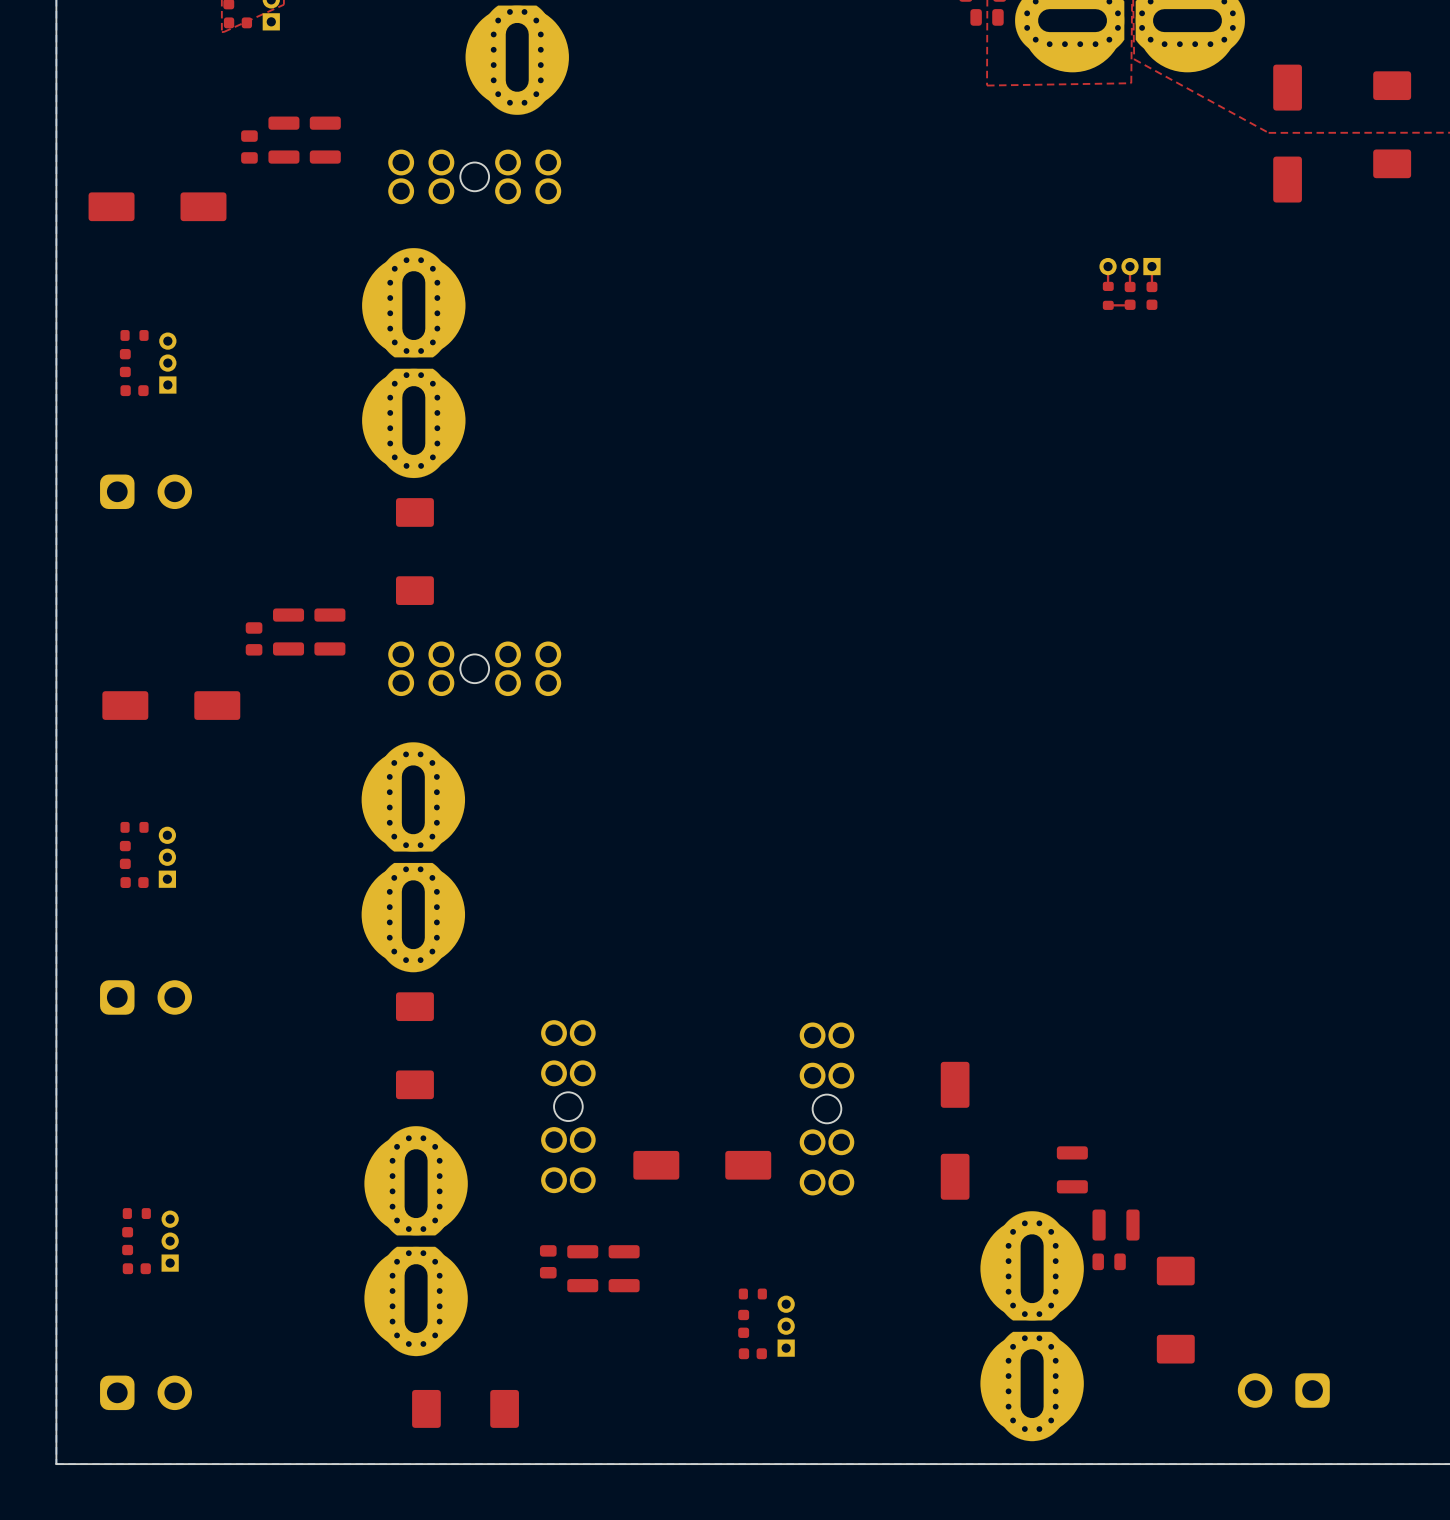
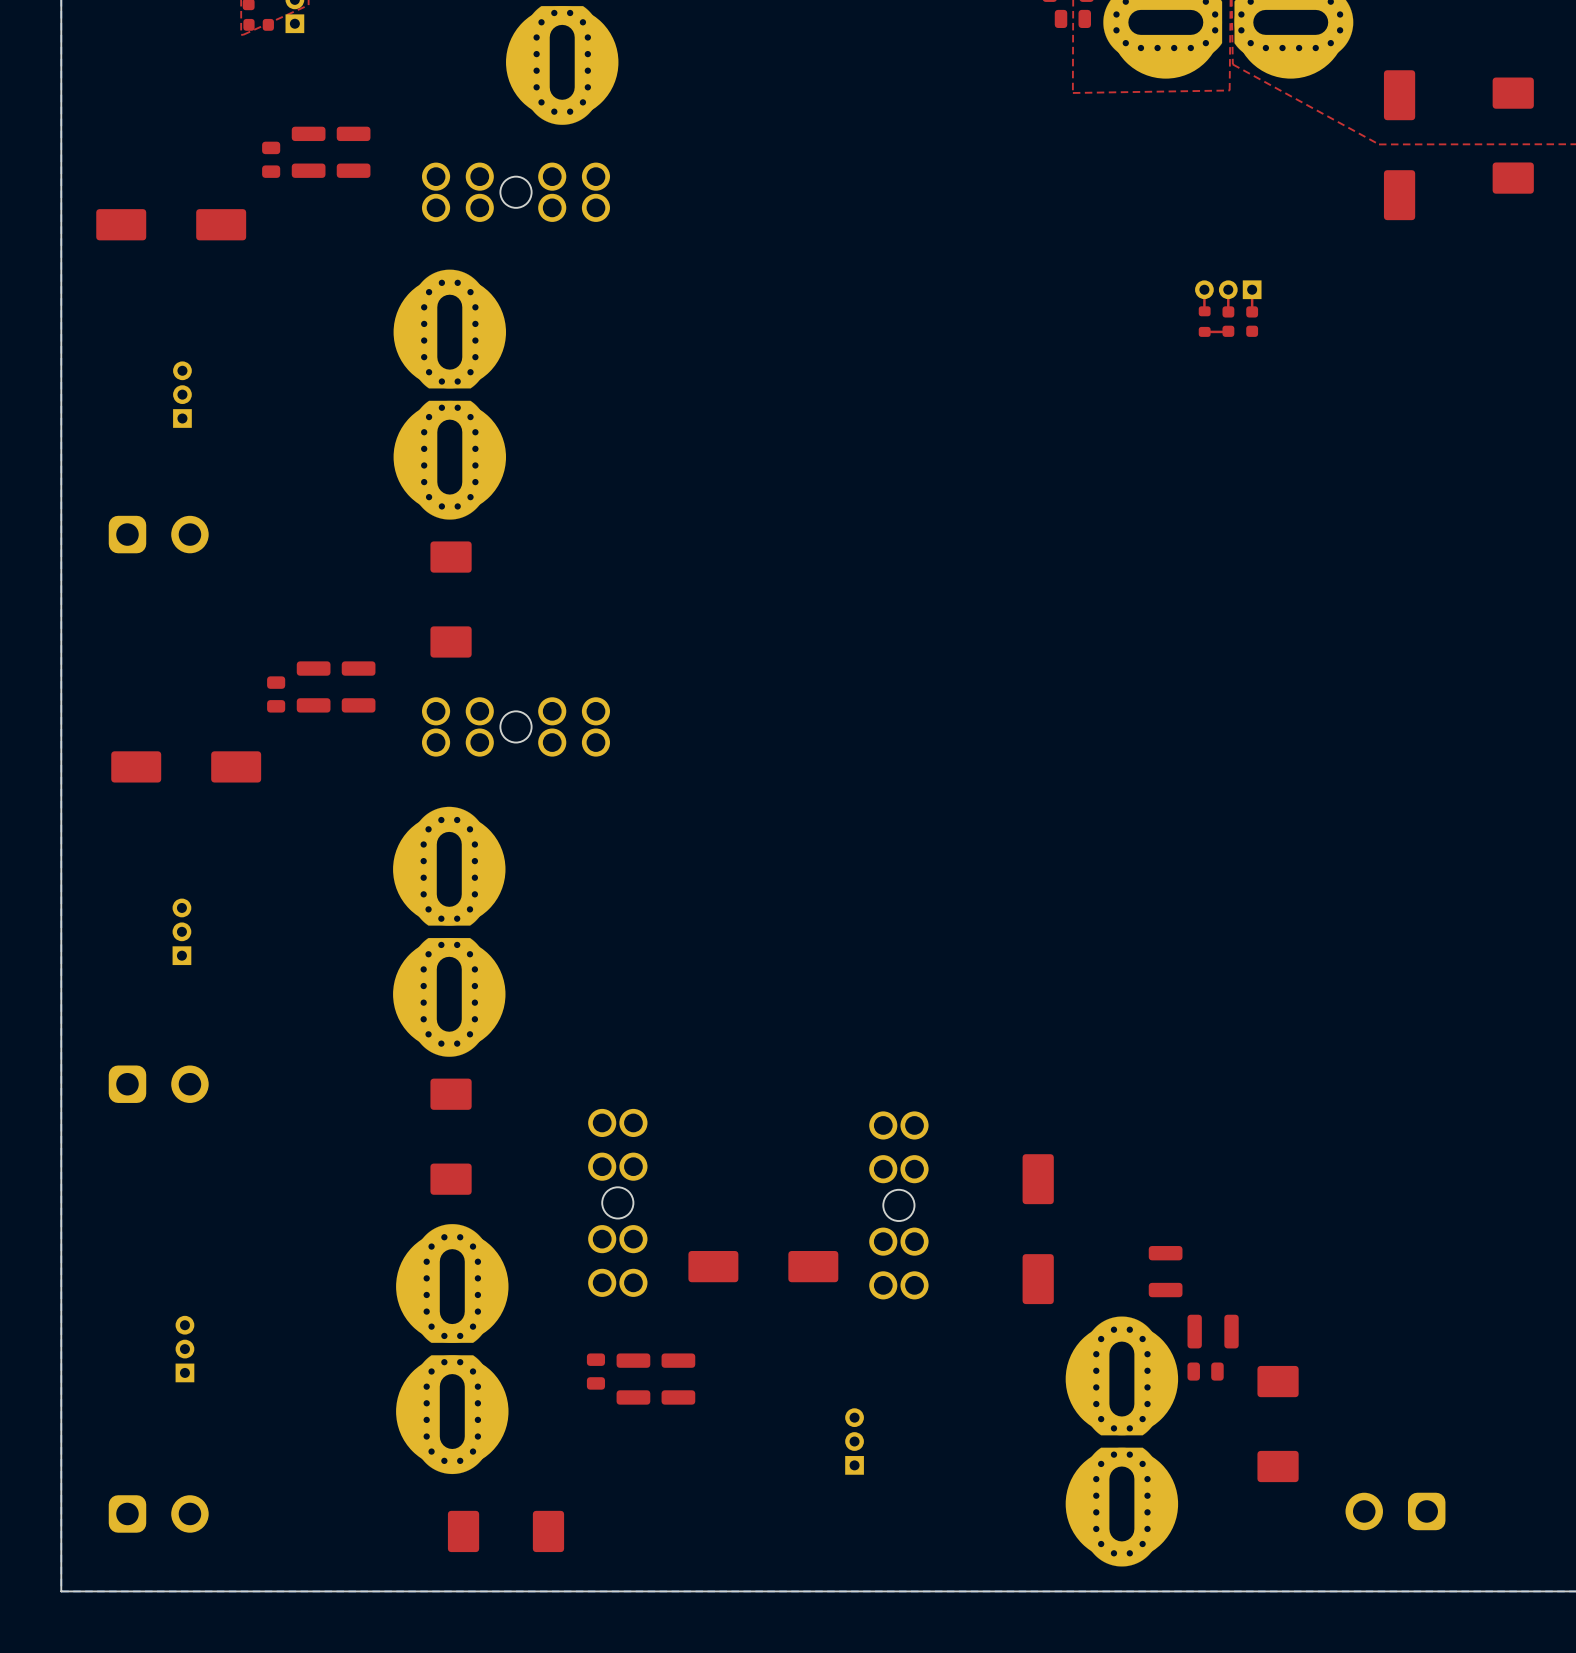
part: (134, 335) -> none
part: (125, 363) -> none
part: (134, 390) -> none
part: (134, 827) -> none
part: (125, 854) -> none
part: (134, 882) -> none
part: (136, 1213) -> none
part: (127, 1241) -> none
part: (136, 1268) -> none
part: (752, 1293) -> none
part: (743, 1323) -> none
part: (752, 1353) -> none

